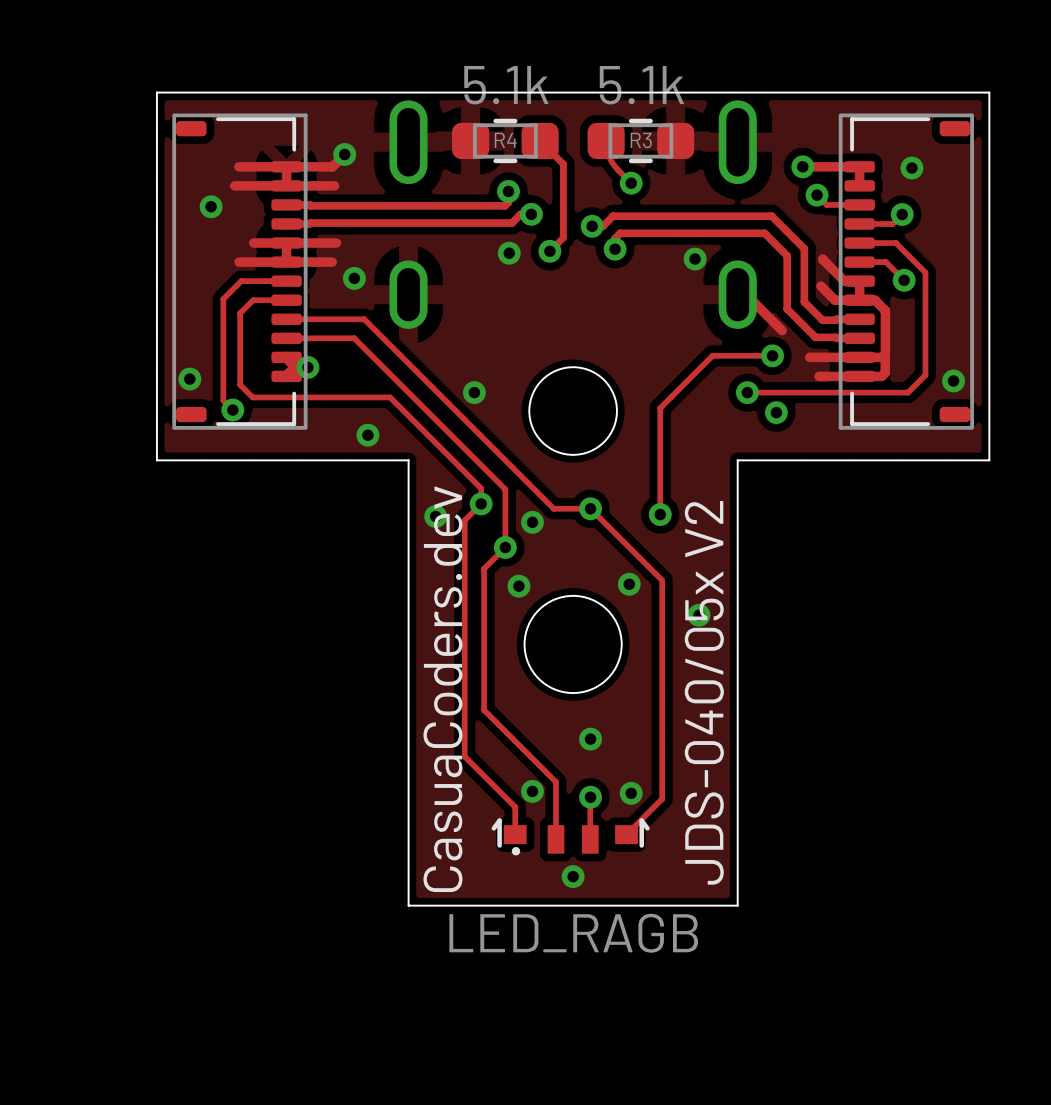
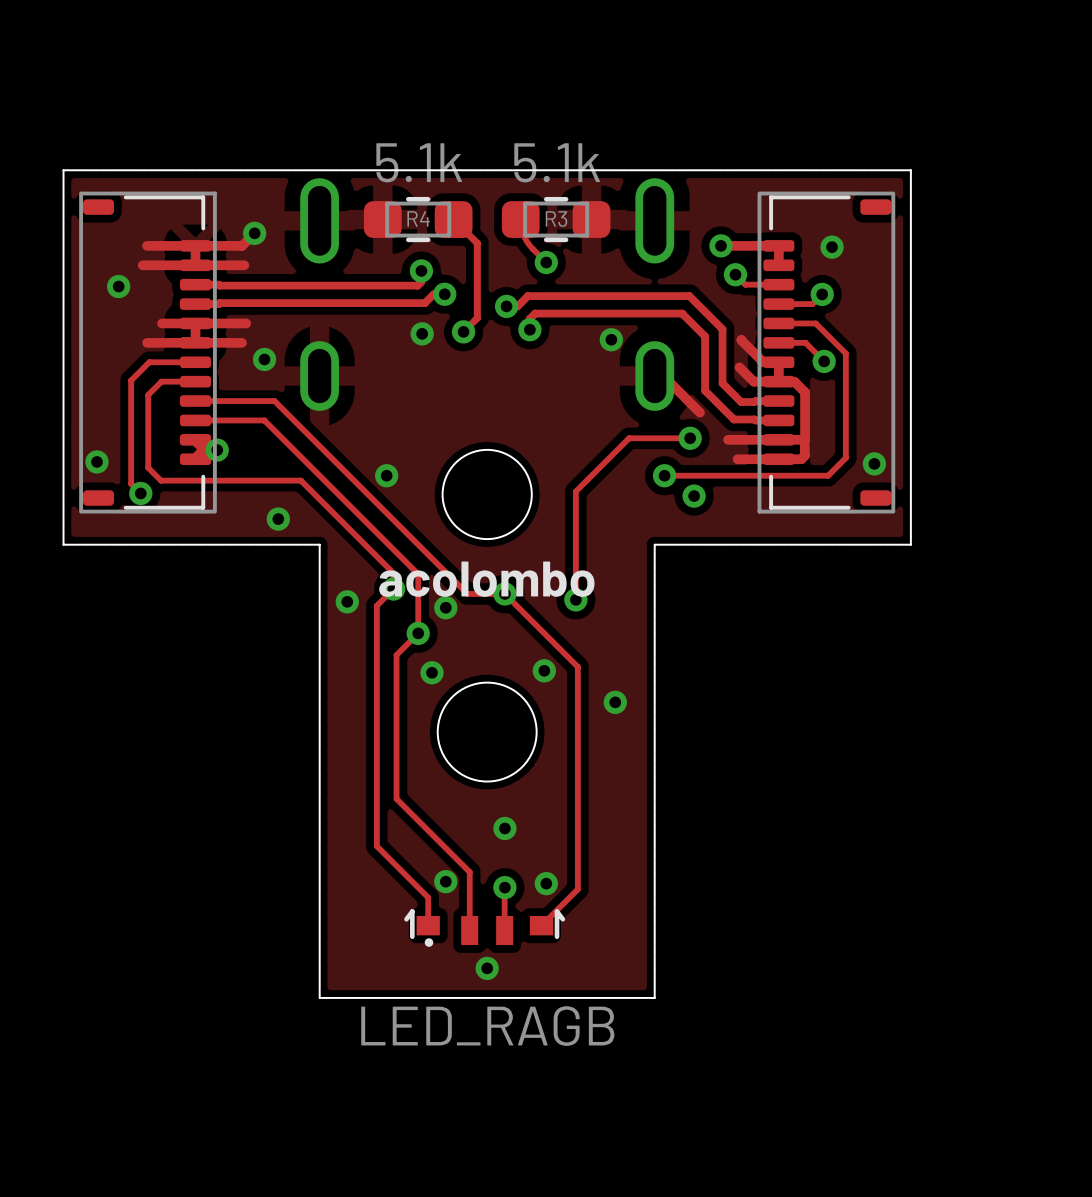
text: none -> acolombo (486, 579)
text: CasuaCoders.dev (442, 689) -> none
text: JDS-040/05x V2 (704, 692) -> none

